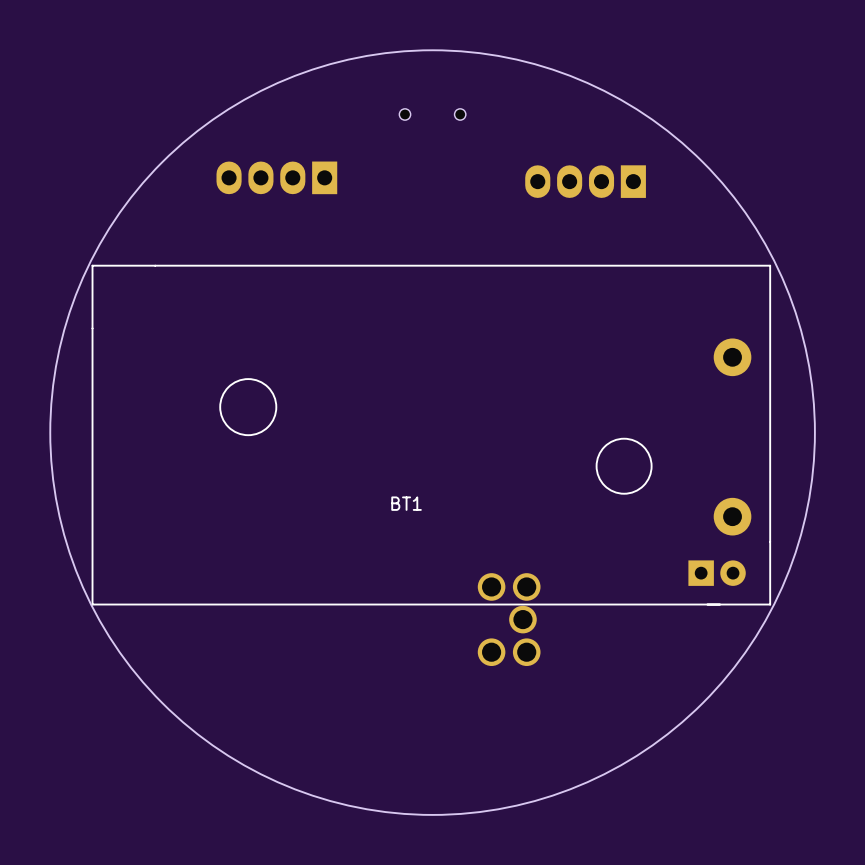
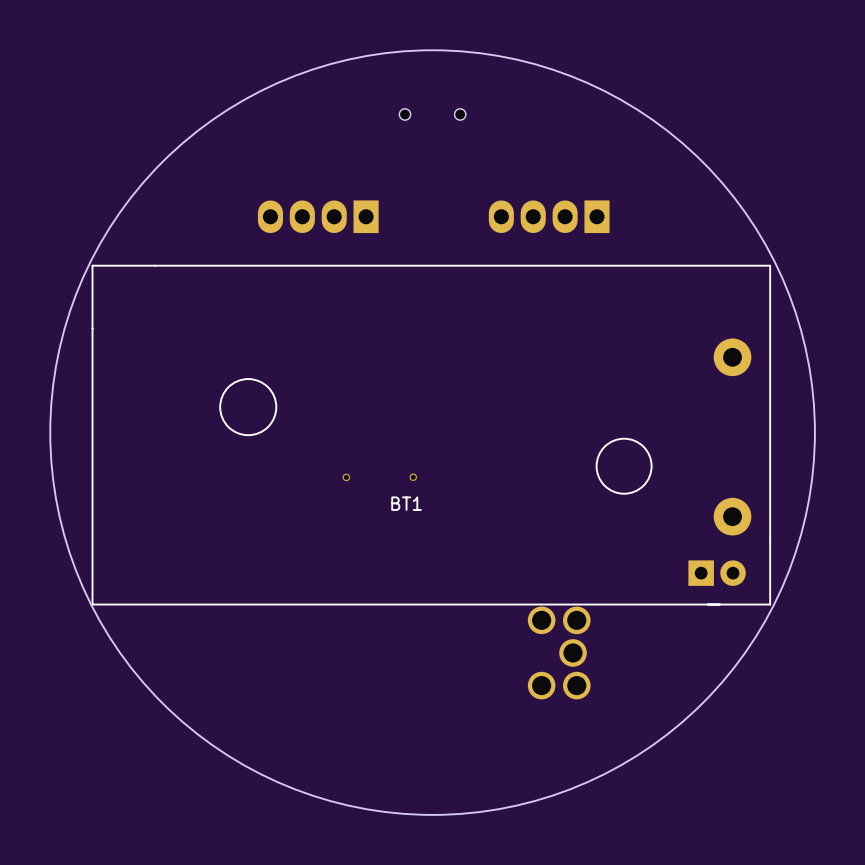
part position: (276, 177) -> (318, 216)
part position: (585, 181) -> (549, 216)
via: none -> (346, 477)
via: none -> (413, 477)
part position: (509, 619) -> (559, 652)

